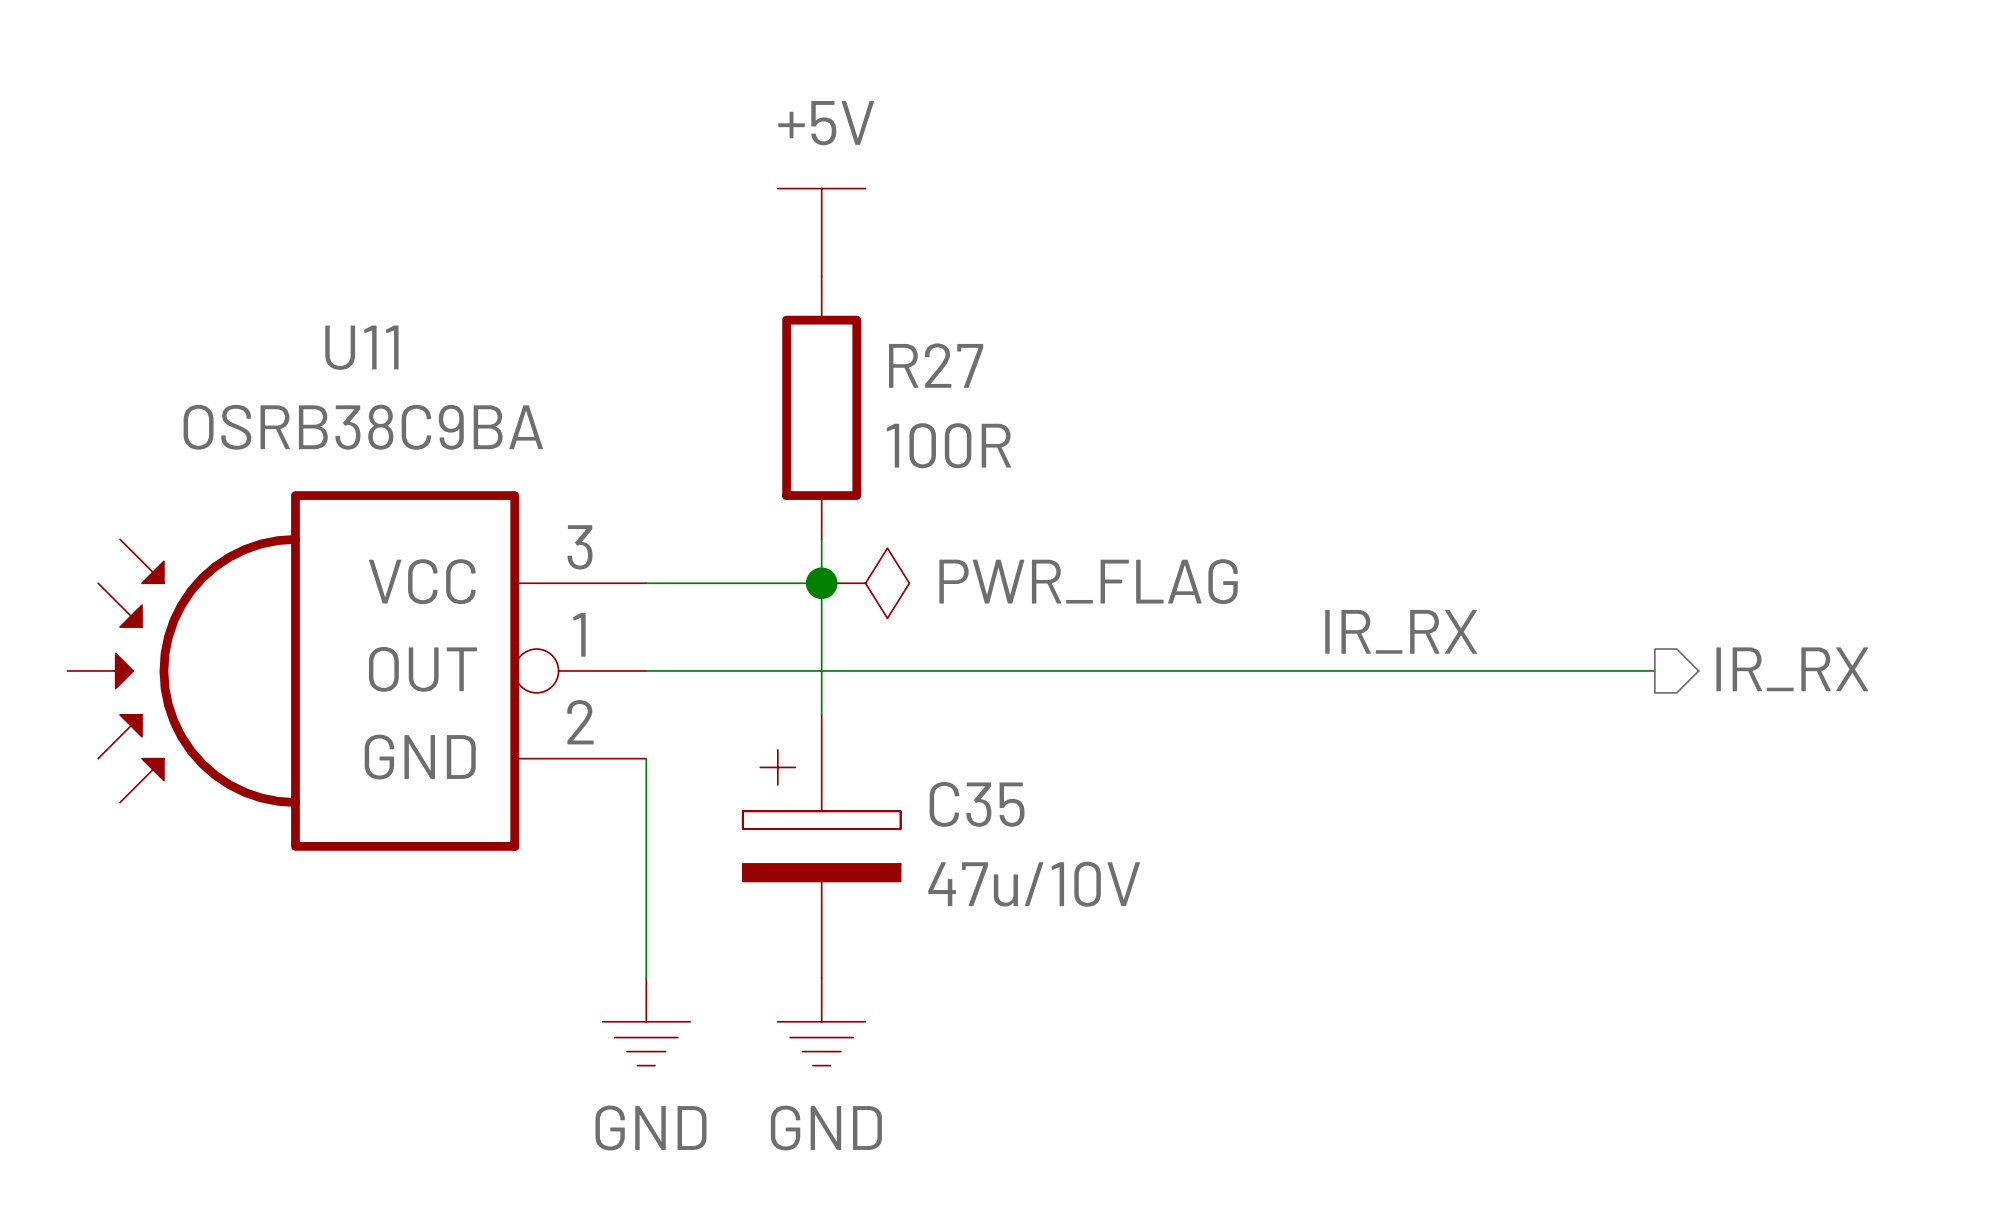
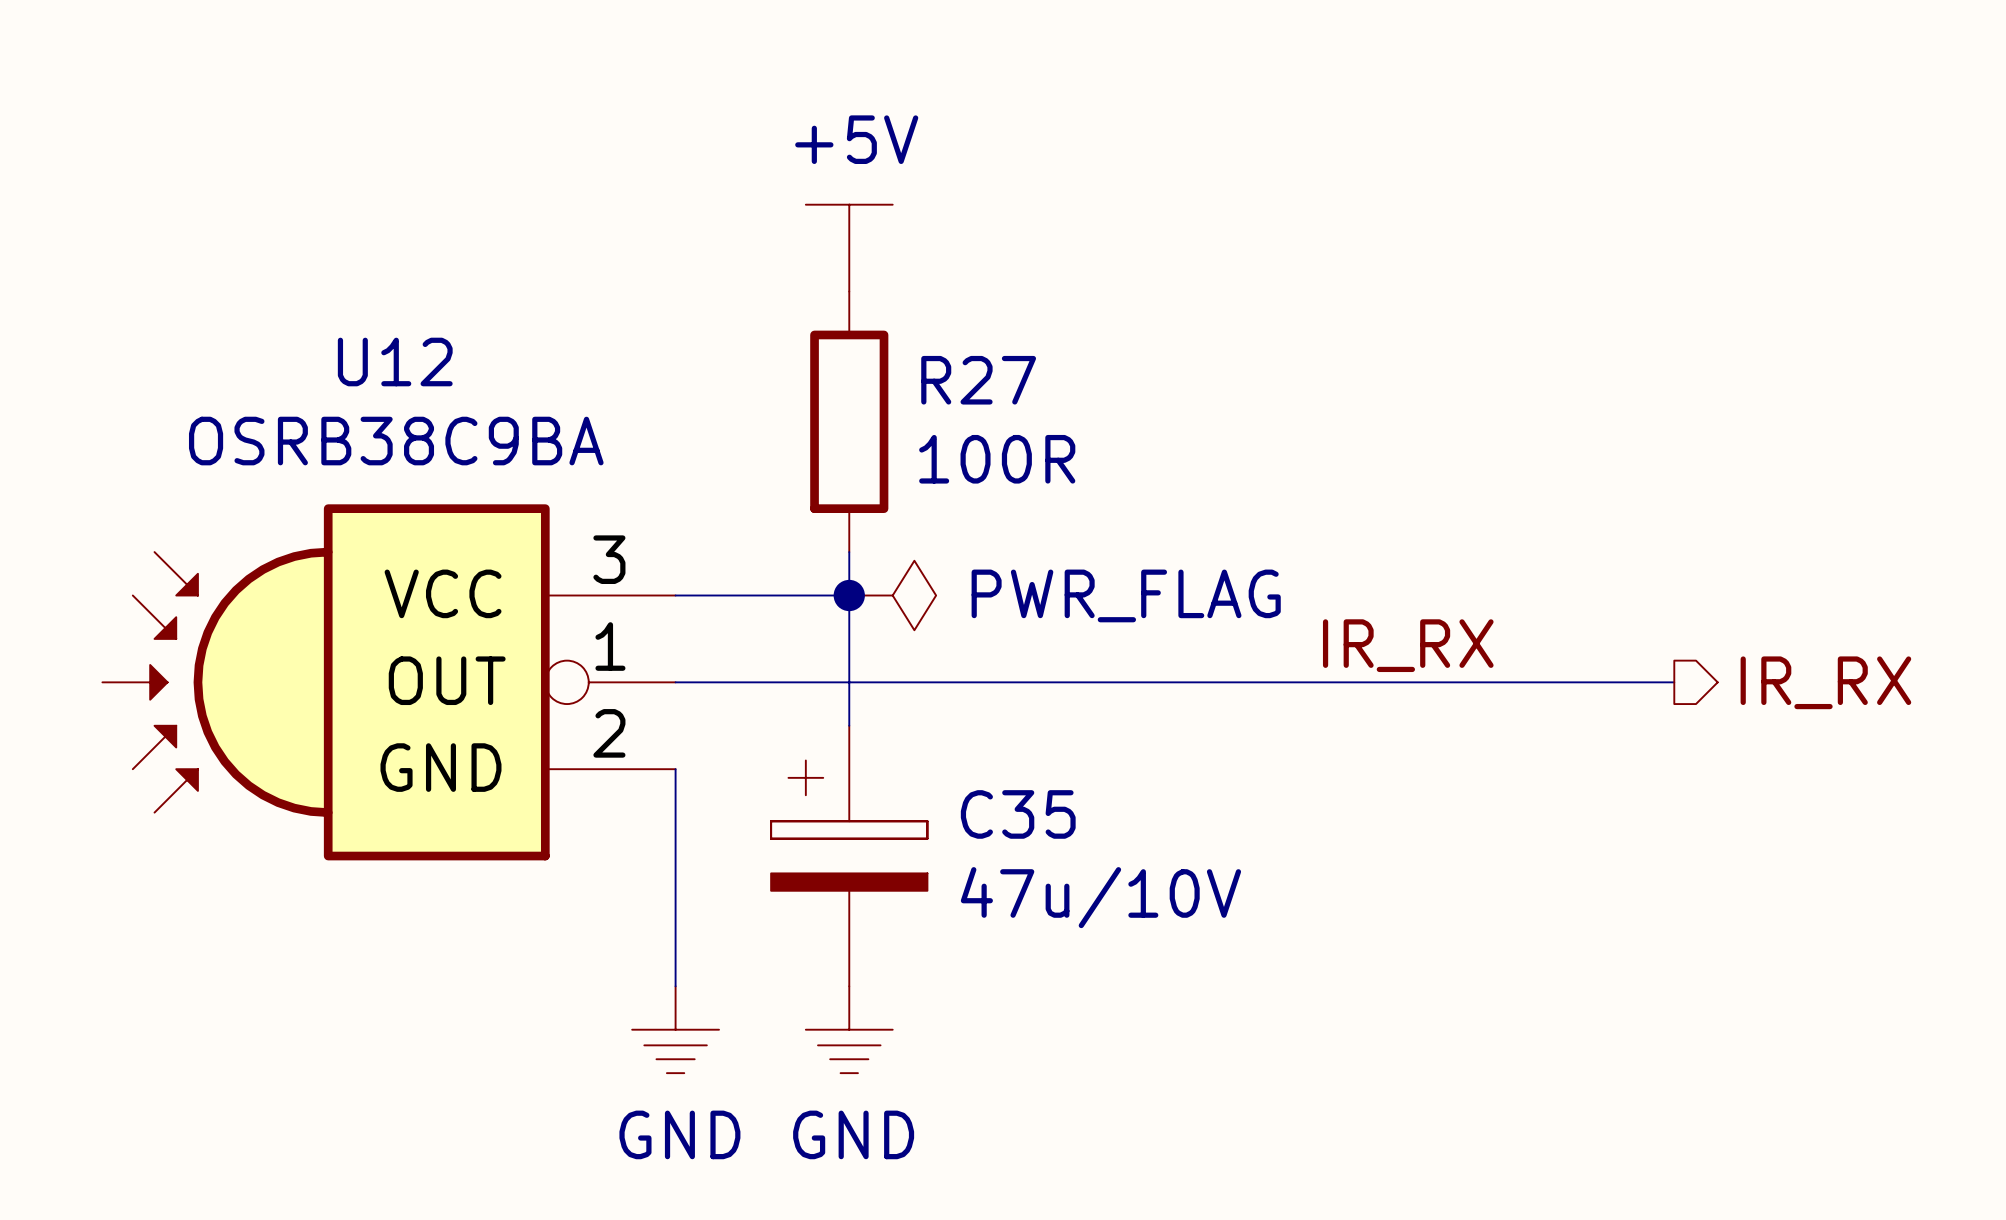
U11 name: U11 (361, 347) -> U12 (395, 362)

